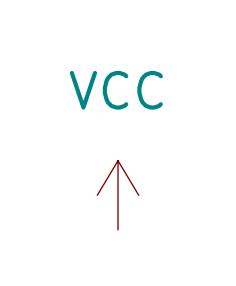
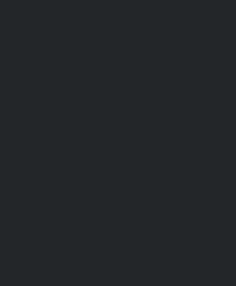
power symbol: VCC (118, 195) -> none

